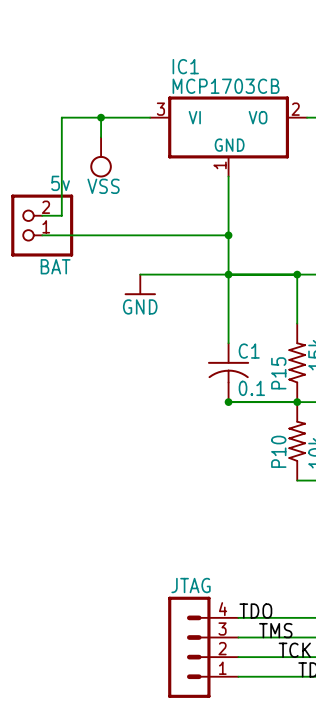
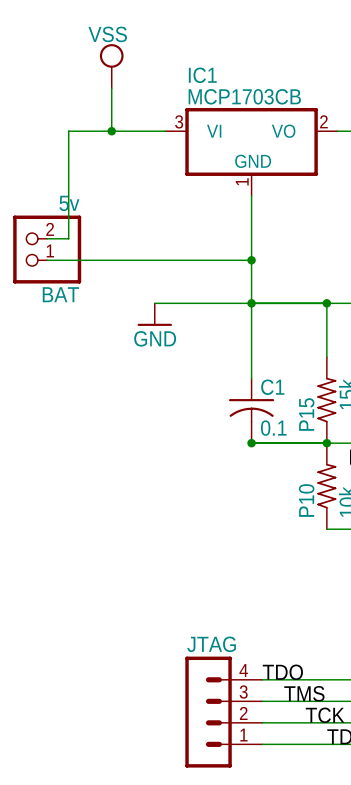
wire: (101, 117) (101, 137) -> (111, 131) (111, 88)
power symbol position: VSS (101, 157) -> VSS (111, 66)
power symbol rotation: 0° (101, 166) -> 180° (111, 55)

